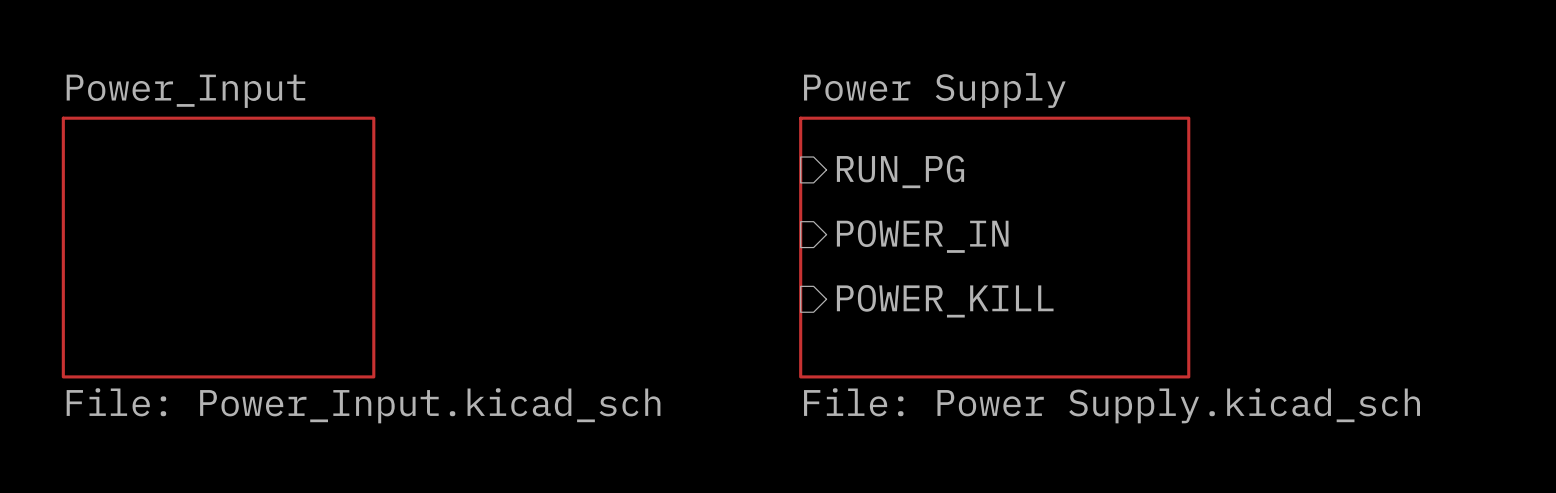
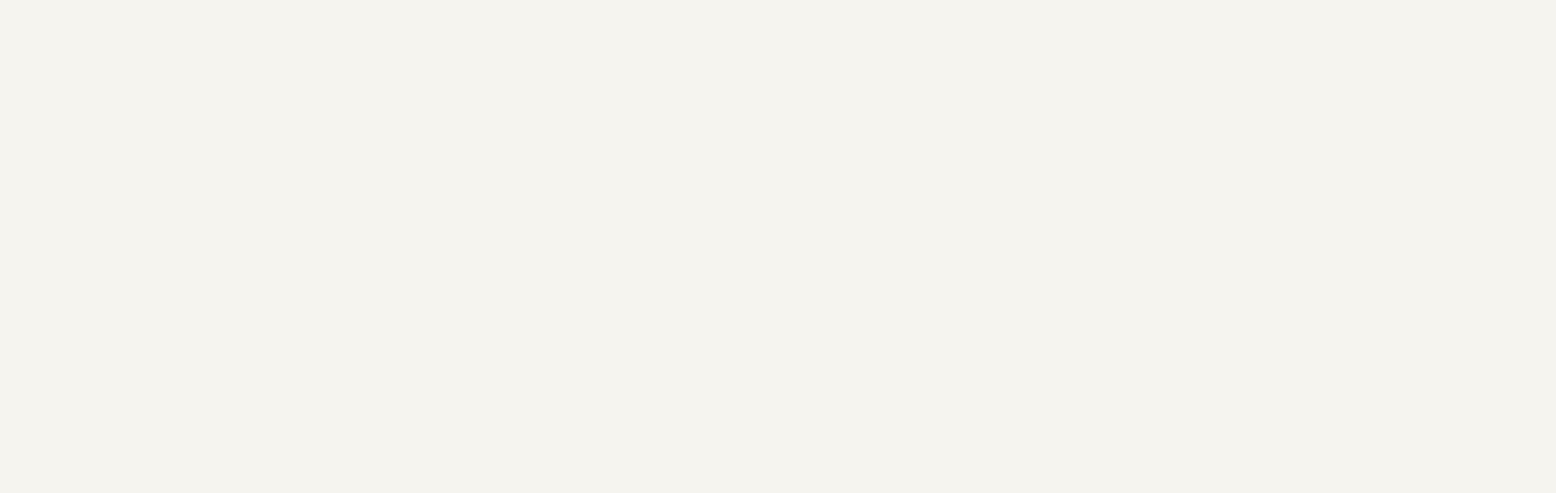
sheet pin: RUN_PG (900, 171) -> none
sheet pin: POWER_IN (922, 236) -> none
sheet Power_Input: File: Power_Input.kicad_sch (218, 247) -> none
sheet Power Supply: File: Power Supply.kicad_sch (994, 247) -> none
sheet pin: POWER_KILL (945, 301) -> none

